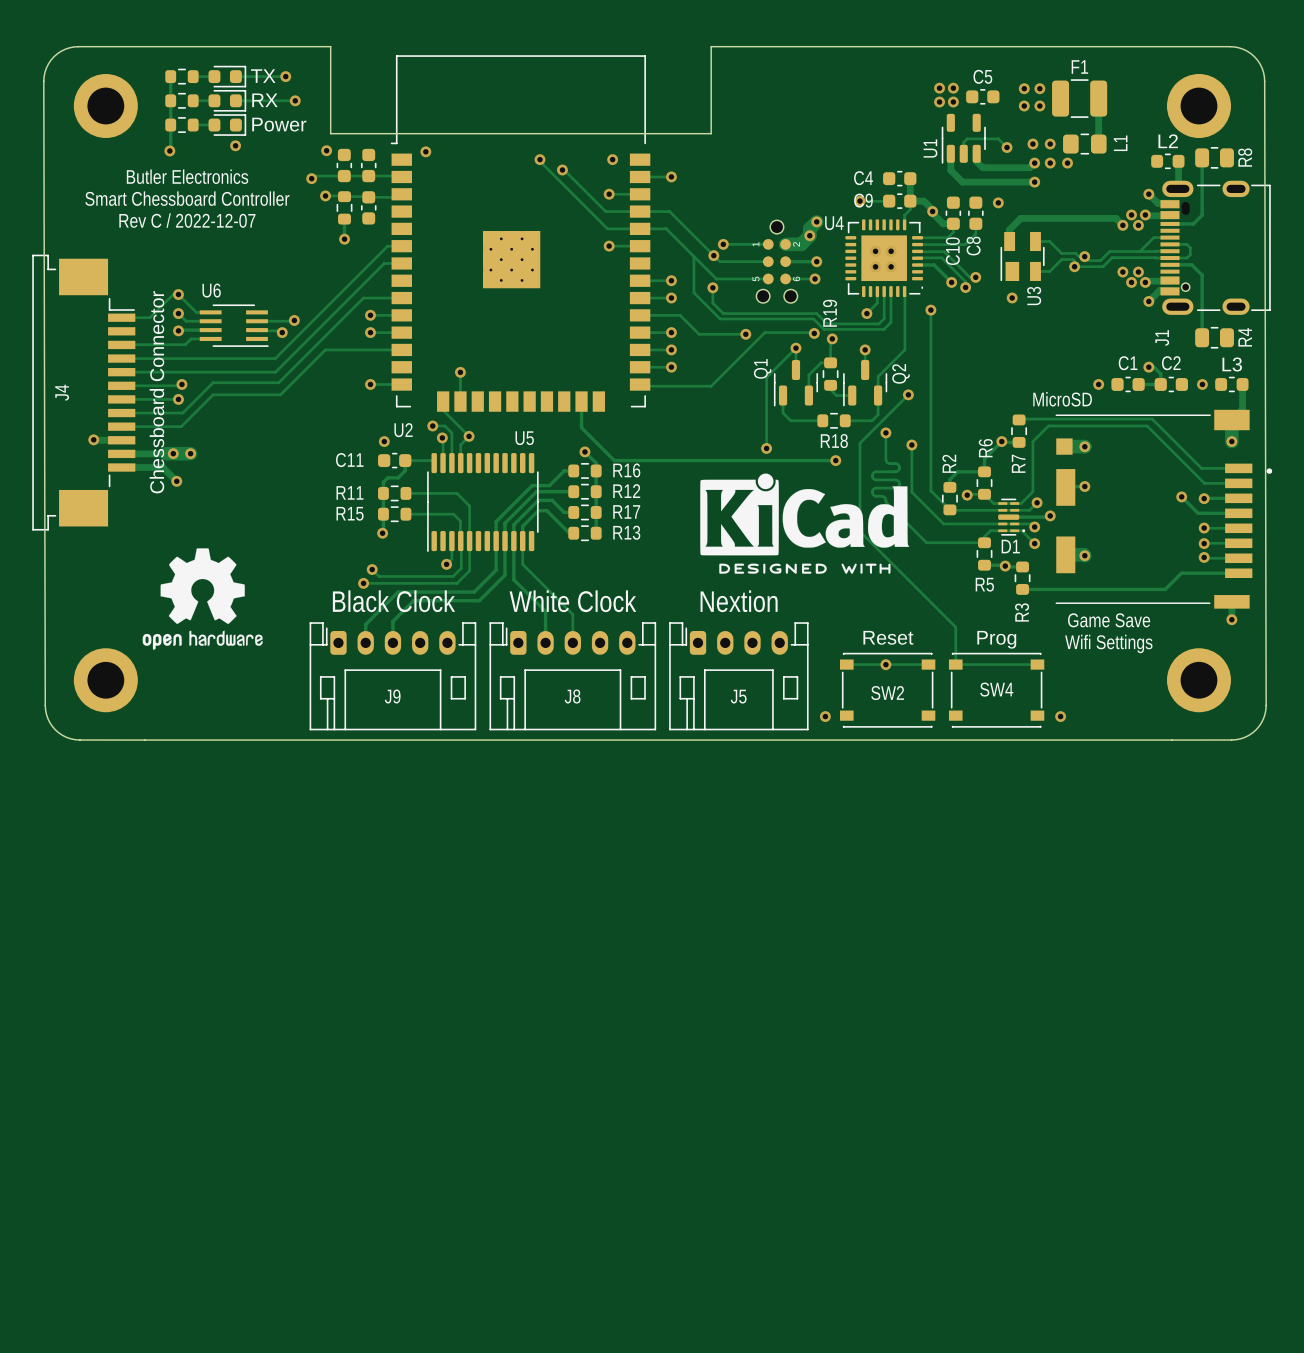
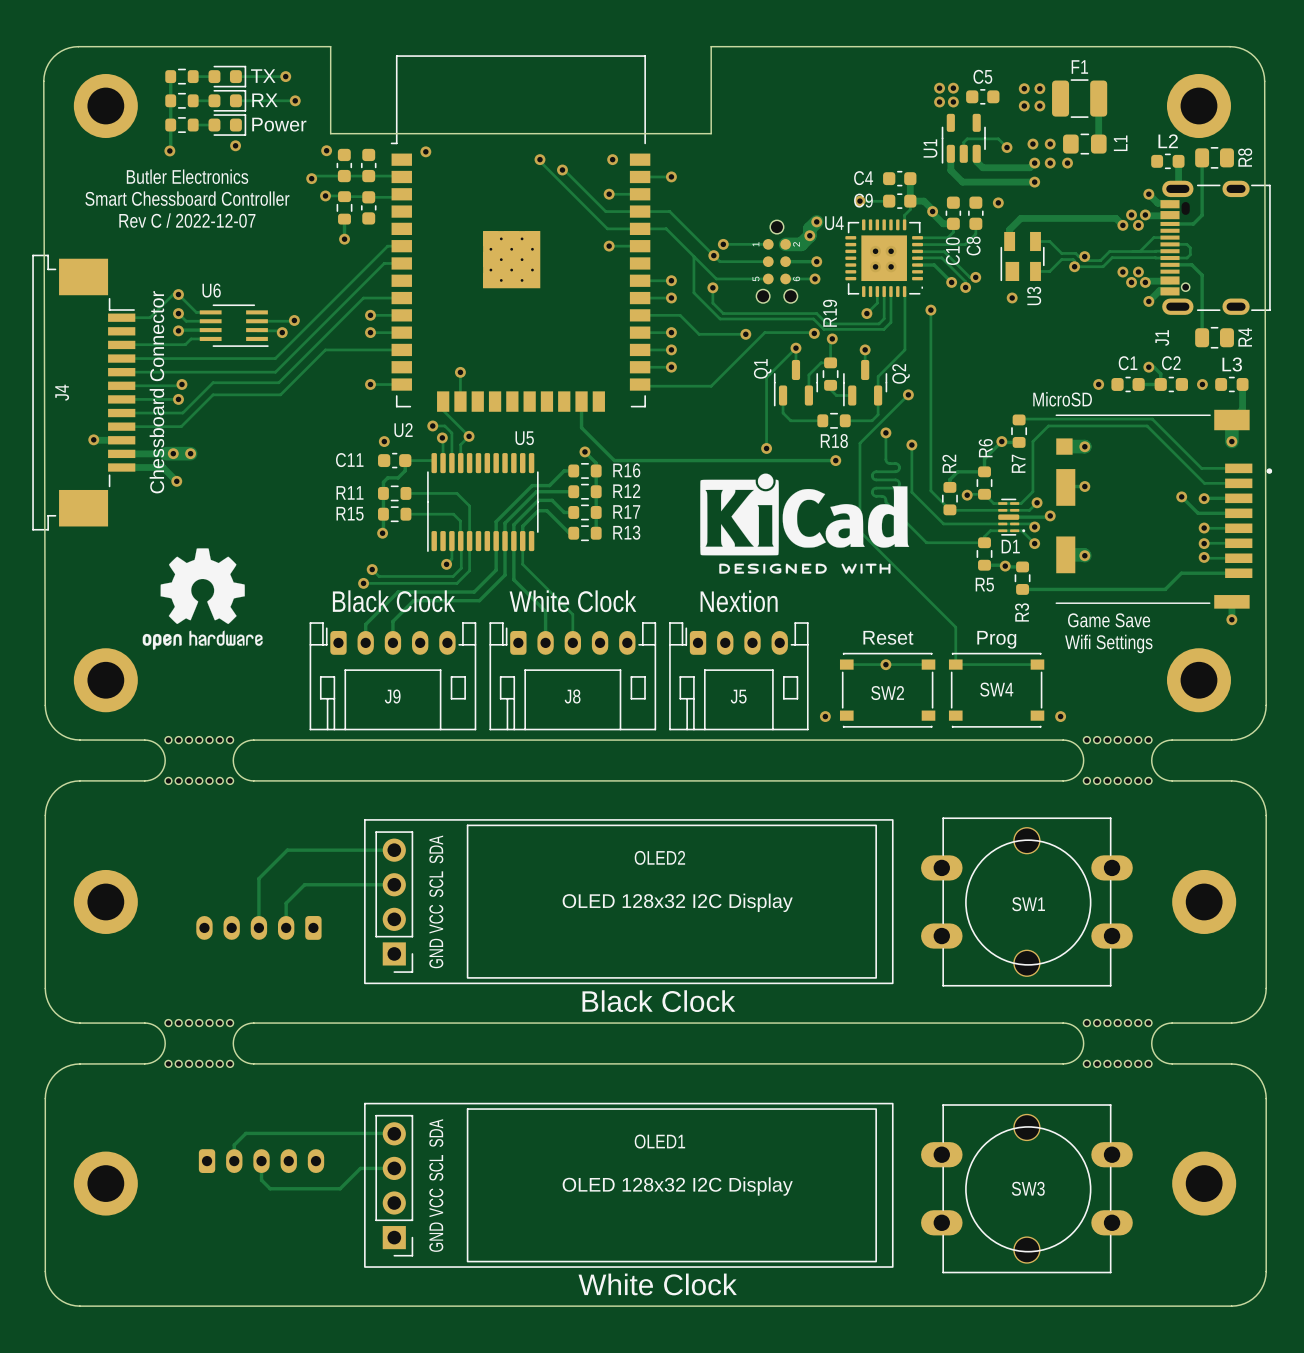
board edge: (144, 740) (253, 740) -> none
board edge: (1063, 740) (1172, 740) -> none
part: none -> (199, 760)
part: none -> (1117, 760)
board edge: none -> (144, 780) (79, 780) (66, 783) (52, 794) (46, 806) (45, 815) (45, 988) (47, 1001) (58, 1015) (70, 1021) (144, 1023)
board edge: none -> (253, 780) (1063, 780)
board edge: none -> (1172, 780) (1231, 780) (1244, 783) (1256, 791) (1261, 798) (1266, 815) (1266, 988) (1263, 1001) (1256, 1012) (1240, 1021) (1172, 1023)
track: none -> (394, 850) (287, 850) (258, 878) (258, 927)
track: none -> (394, 884) (304, 884) (286, 903) (286, 927)
part: none -> (105, 901)
OLED2: none -> (628, 901)
SW1: none -> (1026, 901)
part: none -> (1204, 901)
part: none -> (258, 927)
text: none -> Black Clock (658, 1001)
board edge: none -> (253, 1023) (1063, 1023)
part: none -> (199, 1043)
part: none -> (1117, 1043)
board edge: none -> (144, 1063) (70, 1065) (55, 1074) (46, 1089) (45, 1276) (47, 1284) (55, 1296) (70, 1304) (1240, 1304) (1252, 1298) (1259, 1292) (1265, 1276) (1265, 1089) (1256, 1074) (1240, 1065) (1172, 1063)
board edge: none -> (253, 1063) (1063, 1063)
track: none -> (394, 1133) (245, 1133) (234, 1145) (234, 1161)
track: none -> (261, 1161) (261, 1180) (270, 1188) (340, 1188) (360, 1168) (394, 1168)
part: none -> (261, 1161)
part: none -> (105, 1183)
part: none -> (1204, 1183)
OLED1: none -> (628, 1185)
SW3: none -> (1026, 1188)
text: none -> White Clock (657, 1284)

